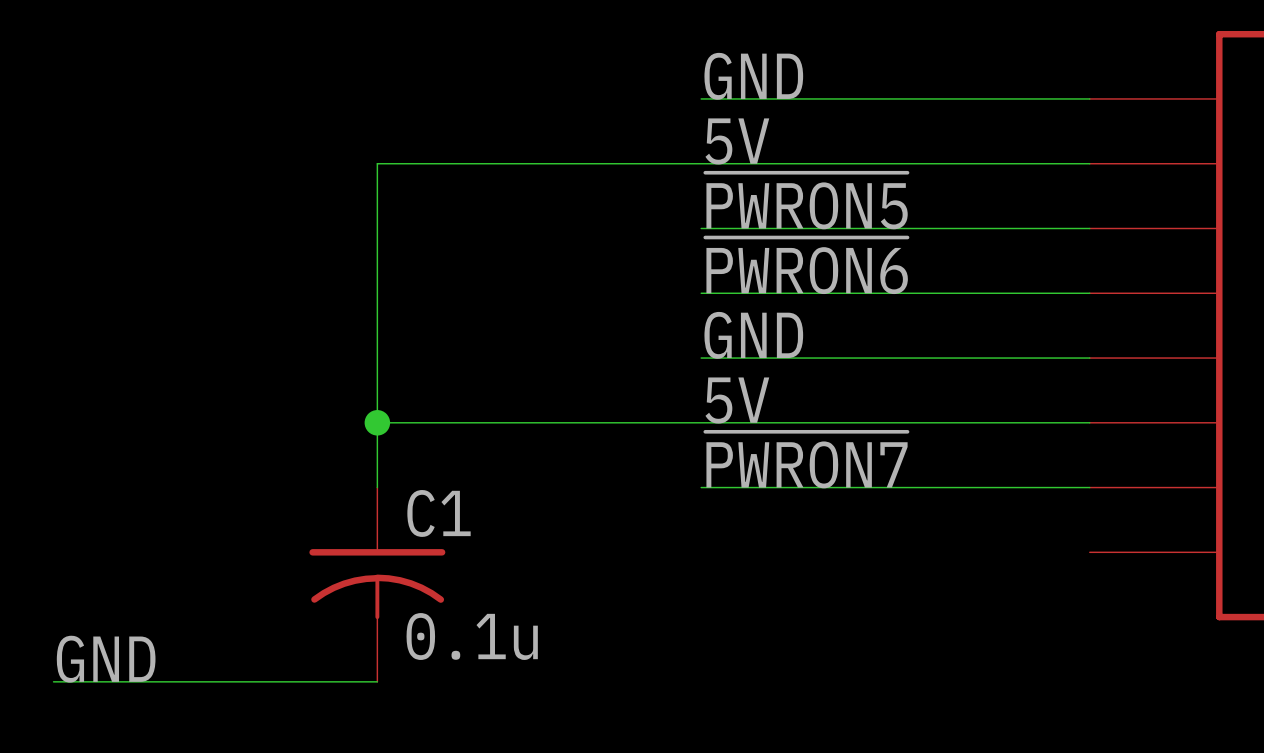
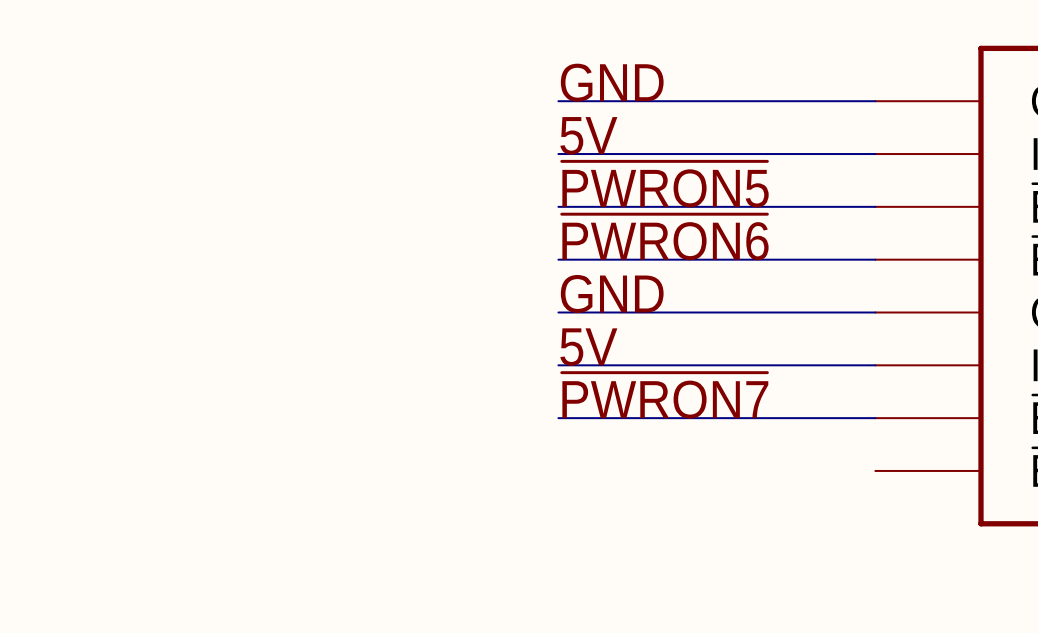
wire: (701, 163) (377, 163) (377, 487) -> none
wire: (377, 422) (701, 422) -> none
junction: (377, 422) -> none
C1: 0.1u (377, 584) -> none
label: GND (106, 659) -> none
wire: (53, 681) (377, 681) -> none

